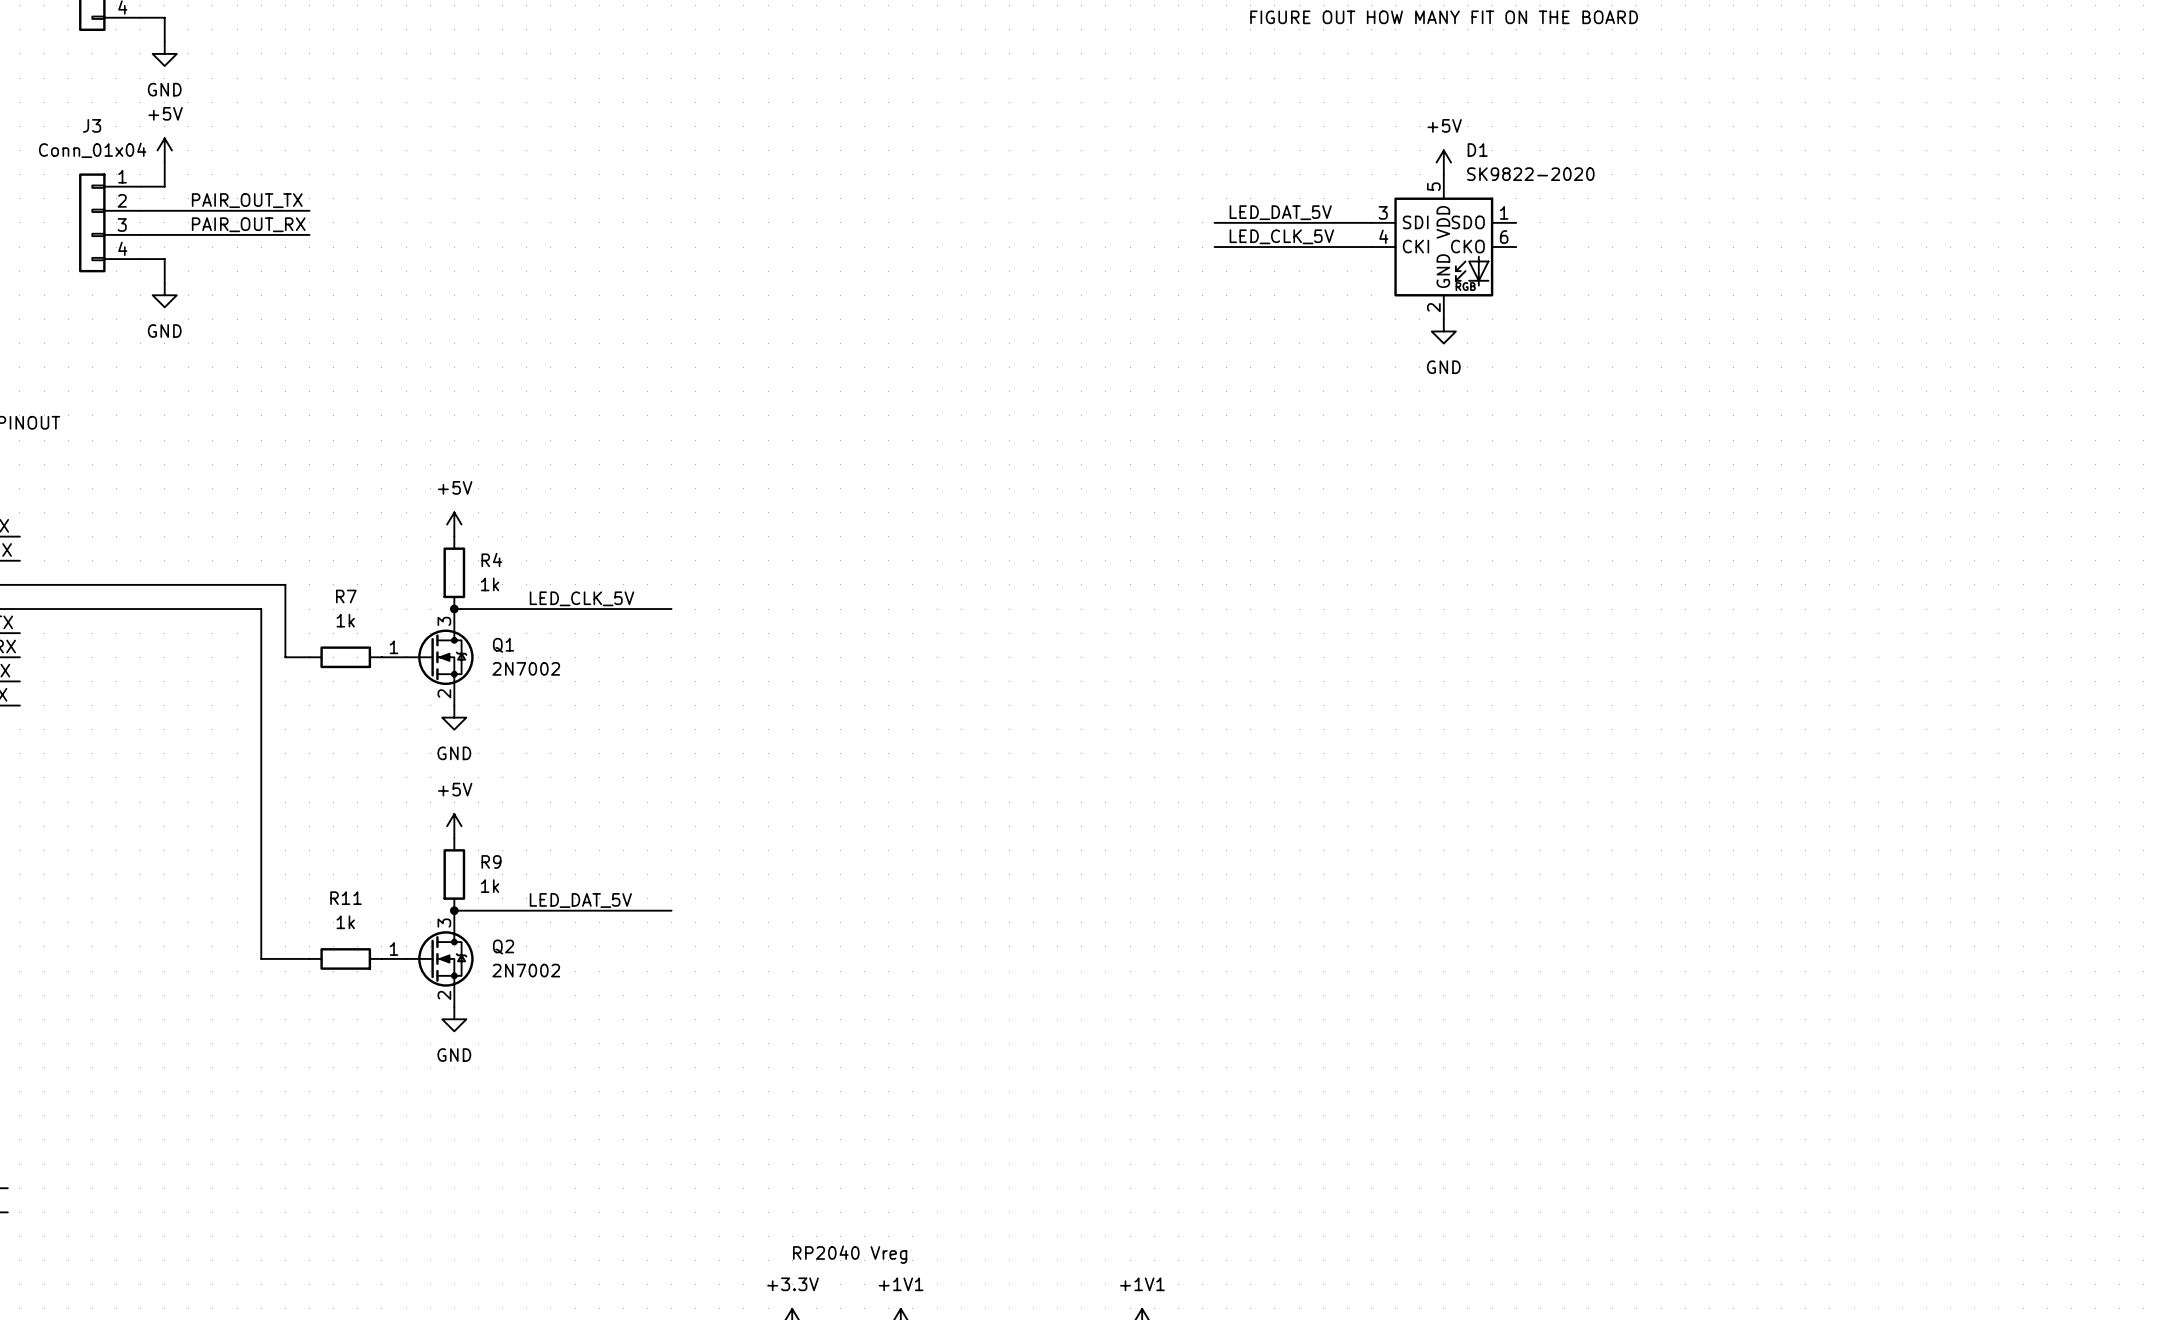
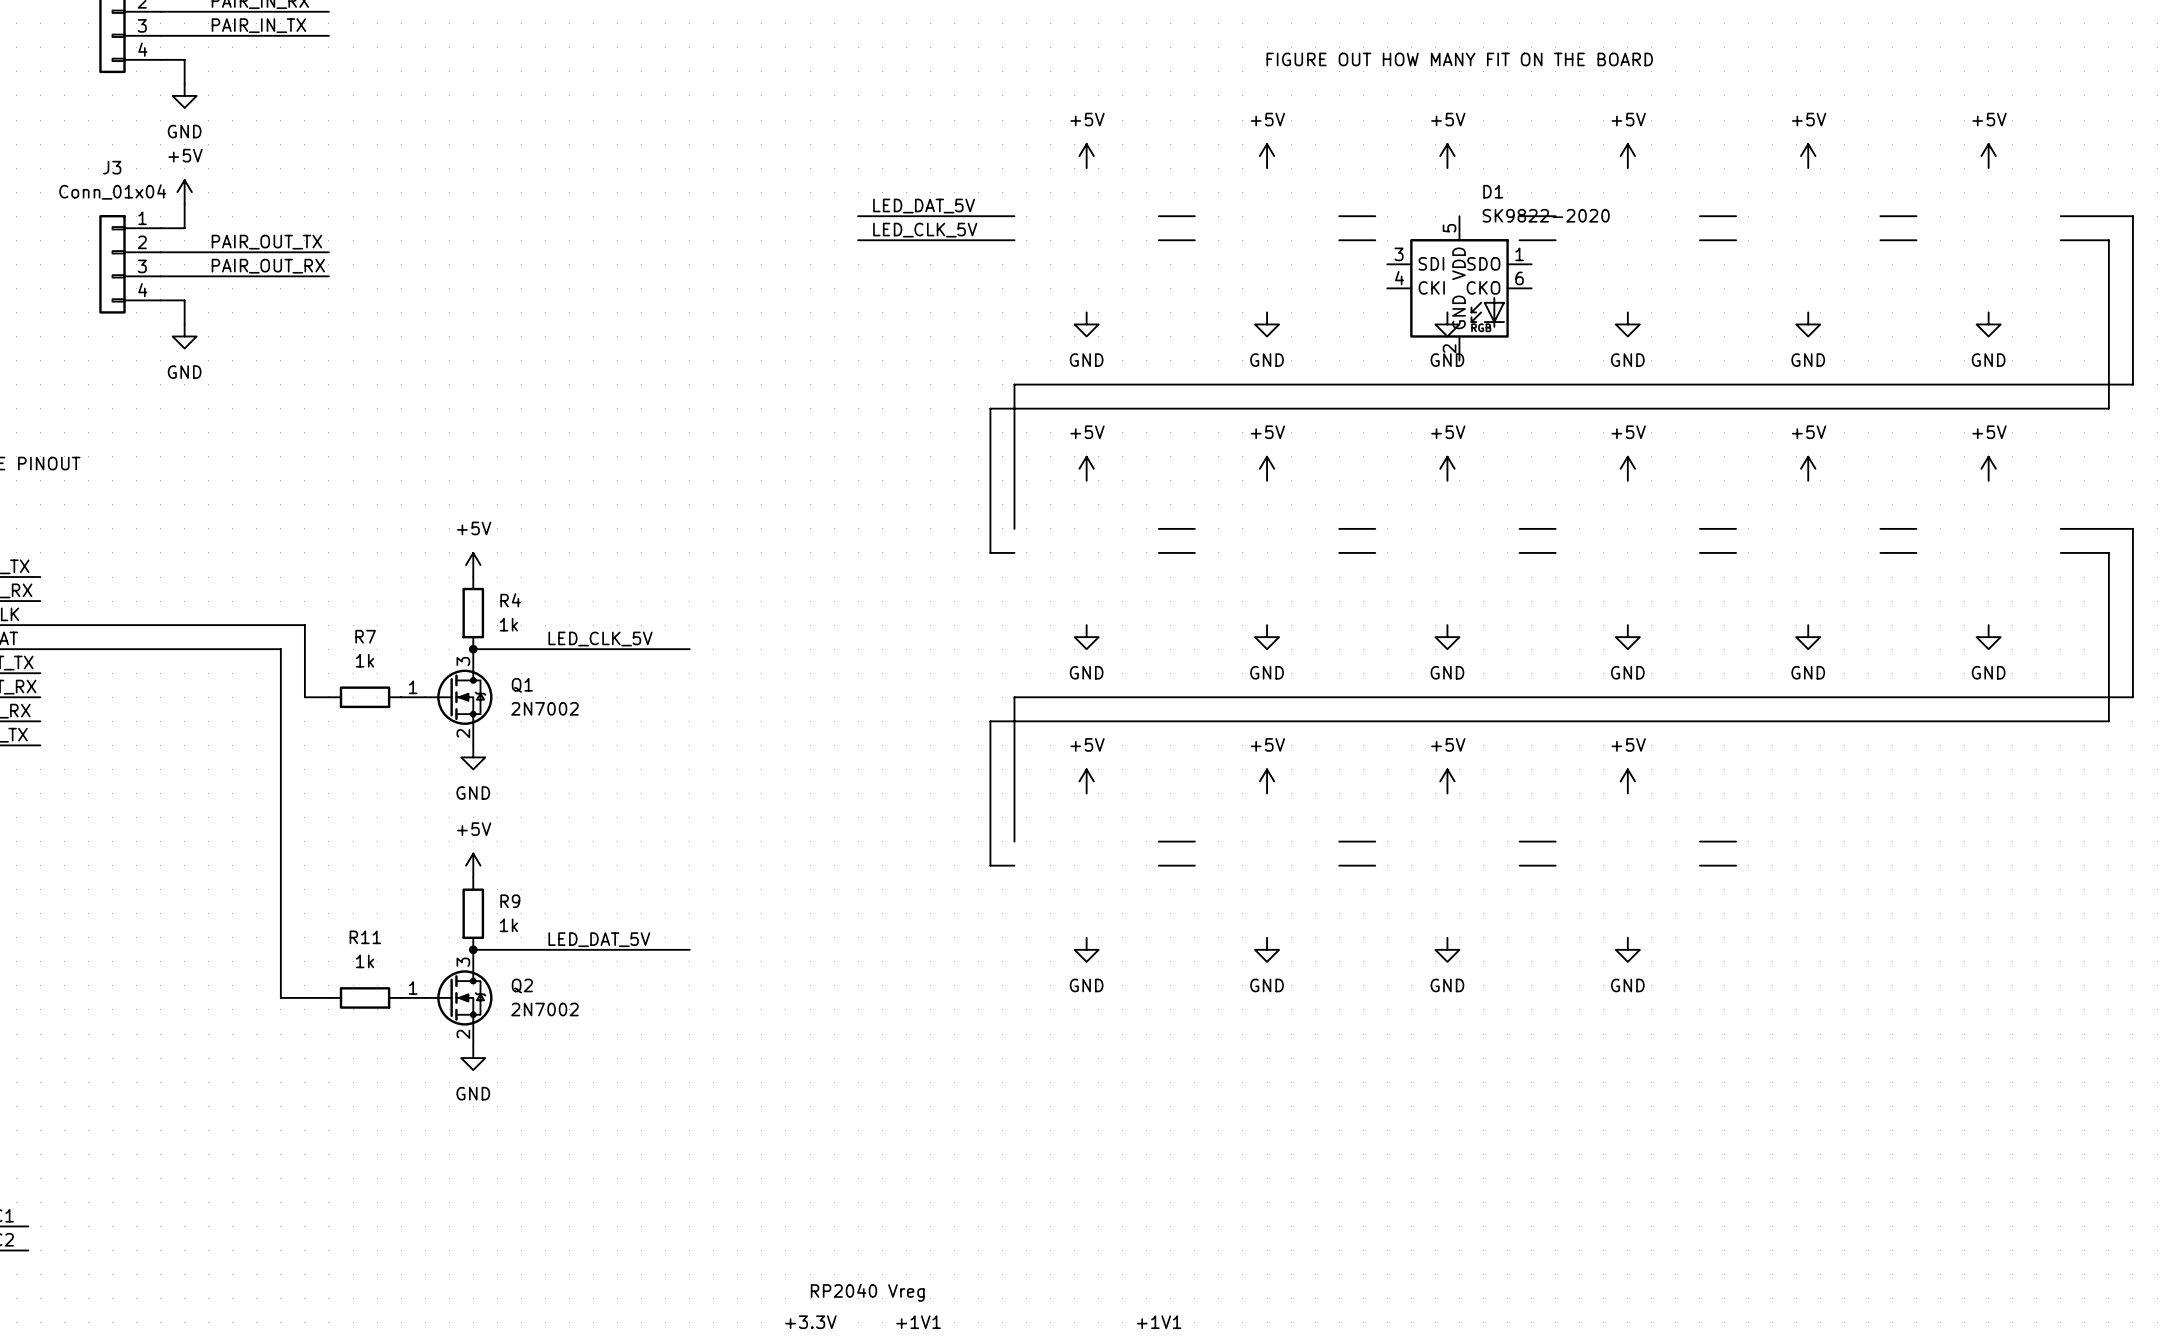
power symbol: none -> +5V (1086, 156)
power symbol: none -> +5V (1267, 156)
power symbol: none -> +5V (1627, 156)
power symbol: none -> +5V (1808, 156)
power symbol: none -> +5V (1988, 156)
power symbol position: +5V (1443, 162) -> +5V (1447, 156)
label: none -> LED_DAT_5V (924, 206)
wire: none -> (858, 216) (1014, 216)
wire: none -> (1158, 216) (1194, 216)
wire: none -> (1339, 216) (1375, 216)
wire: none -> (1519, 216) (1555, 216)
wire: none -> (1699, 216) (1736, 216)
wire: none -> (1880, 216) (1916, 216)
wire: none -> (2060, 216) (2132, 216) (2132, 384) (1014, 384) (1014, 528)
label: none -> LED_CLK_5V (925, 230)
wire: none -> (858, 240) (1014, 240)
wire: none -> (1158, 240) (1194, 240)
wire: none -> (1339, 240) (1375, 240)
wire: none -> (1519, 240) (1555, 240)
wire: none -> (1699, 240) (1736, 240)
wire: none -> (1880, 240) (1916, 240)
wire: none -> (2060, 240) (2108, 240) (2108, 408) (990, 408) (990, 552) (1014, 552)
label: LED_DAT_5V (1280, 212) -> none
wire: (1214, 222) (1371, 222) -> none
label: LED_CLK_5V (1281, 236) -> none
wire: (1214, 247) (1371, 247) -> none
power symbol: none -> GND (1086, 324)
power symbol: none -> GND (1267, 324)
power symbol: none -> GND (1627, 324)
power symbol: none -> GND (1808, 324)
power symbol: none -> GND (1988, 324)
power symbol position: GND (1443, 331) -> GND (1447, 324)
power symbol: none -> +5V (1086, 468)
power symbol: none -> +5V (1267, 468)
power symbol: none -> +5V (1447, 468)
power symbol: none -> +5V (1627, 468)
power symbol: none -> +5V (1808, 468)
power symbol: none -> +5V (1988, 468)
wire: none -> (1158, 528) (1194, 528)
wire: none -> (1339, 528) (1375, 528)
wire: none -> (1519, 528) (1555, 528)
wire: none -> (1699, 528) (1736, 528)
wire: none -> (1880, 528) (1916, 528)
wire: none -> (2060, 528) (2132, 528) (2132, 697) (1014, 697) (1014, 841)
wire: none -> (1158, 552) (1194, 552)
wire: none -> (1339, 552) (1375, 552)
wire: none -> (1519, 552) (1555, 552)
wire: none -> (1699, 552) (1736, 552)
wire: none -> (1880, 552) (1916, 552)
wire: none -> (2060, 552) (2108, 552) (2108, 721) (990, 721) (990, 865) (1014, 865)
power symbol: none -> GND (1086, 637)
power symbol: none -> GND (1267, 637)
power symbol: none -> GND (1447, 637)
power symbol: none -> GND (1627, 637)
power symbol: none -> GND (1808, 637)
power symbol: none -> GND (1988, 637)
power symbol: none -> +5V (1086, 781)
power symbol: none -> +5V (1267, 781)
power symbol: none -> +5V (1447, 781)
power symbol: none -> +5V (1627, 781)
wire: none -> (1158, 841) (1194, 841)
wire: none -> (1339, 841) (1375, 841)
wire: none -> (1519, 841) (1555, 841)
wire: none -> (1699, 841) (1736, 841)
wire: none -> (1158, 865) (1194, 865)
wire: none -> (1339, 865) (1375, 865)
wire: none -> (1519, 865) (1555, 865)
wire: none -> (1699, 865) (1736, 865)
power symbol: none -> GND (1086, 949)
power symbol: none -> GND (1267, 949)
power symbol: none -> GND (1447, 949)
power symbol: none -> GND (1627, 949)

